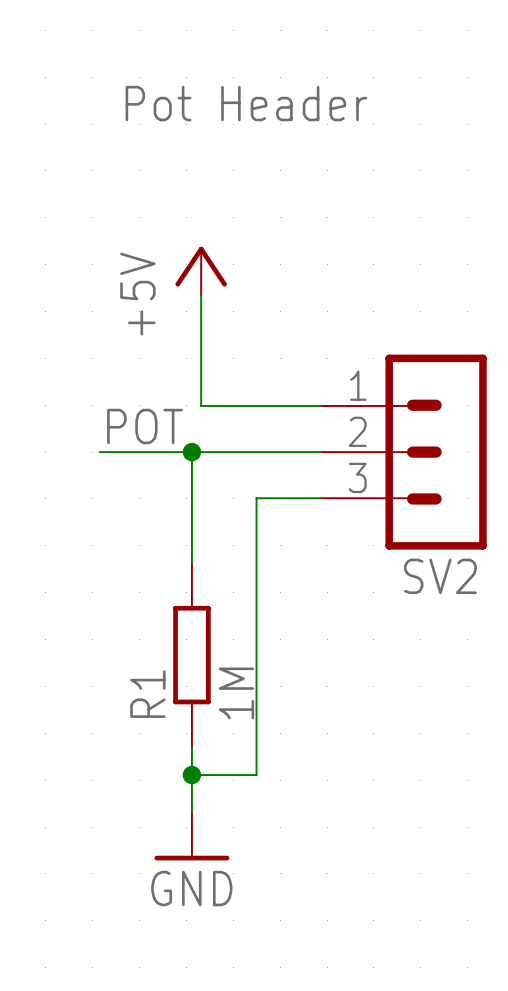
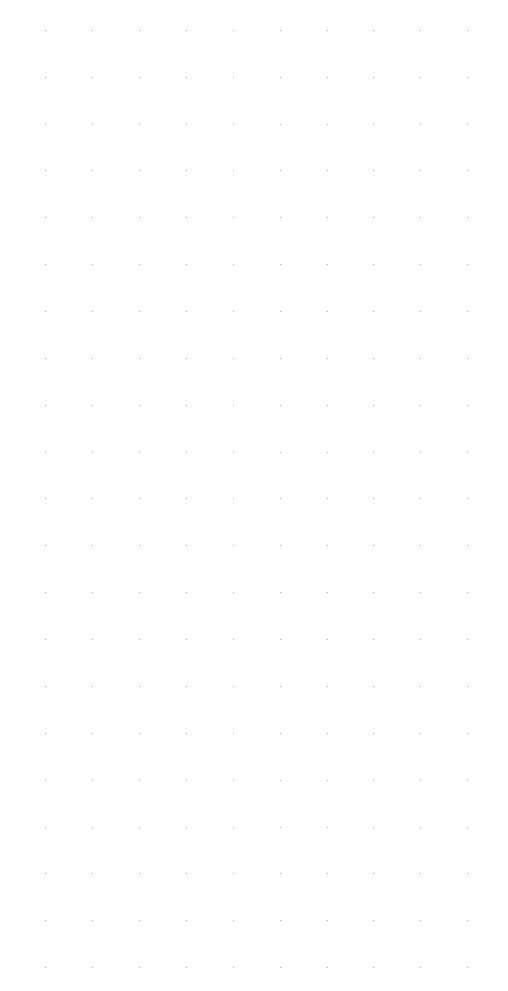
text: Pot Header (246, 103) -> none
power symbol: +5V (201, 271) -> none
wire: (201, 295) (201, 405) (321, 405) -> none
label: POT (144, 426) -> none
wire: (99, 452) (321, 452) -> none
wire: (191, 452) (191, 562) -> none
junction: (191, 452) -> none
SV2: (403, 452) -> none
wire: (321, 498) (256, 498) (256, 775) (191, 775) -> none
R1: 1M (191, 655) -> none
wire: (191, 747) (191, 811) -> none
junction: (191, 775) -> none
power symbol: GND (191, 836) -> none

